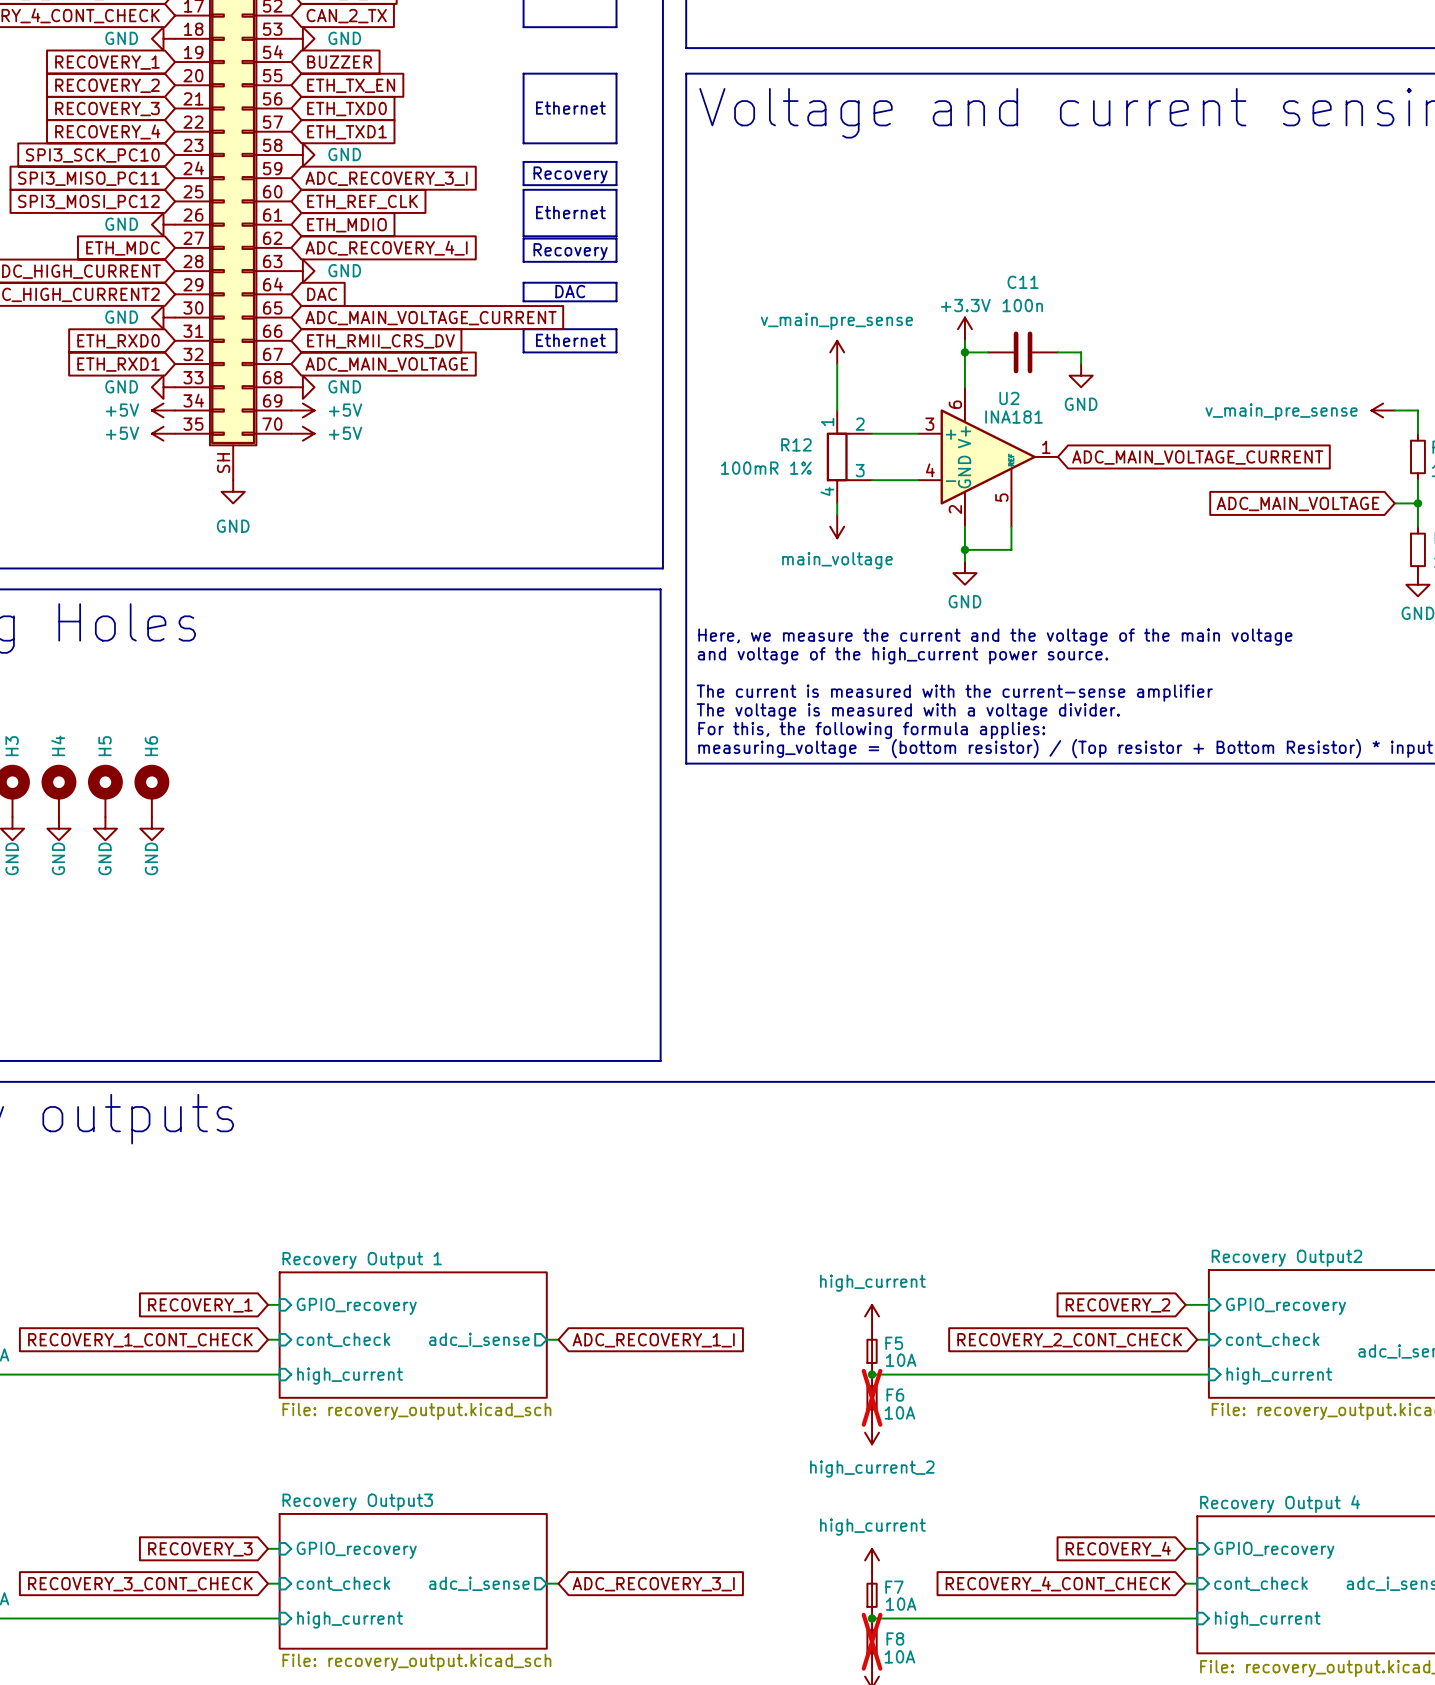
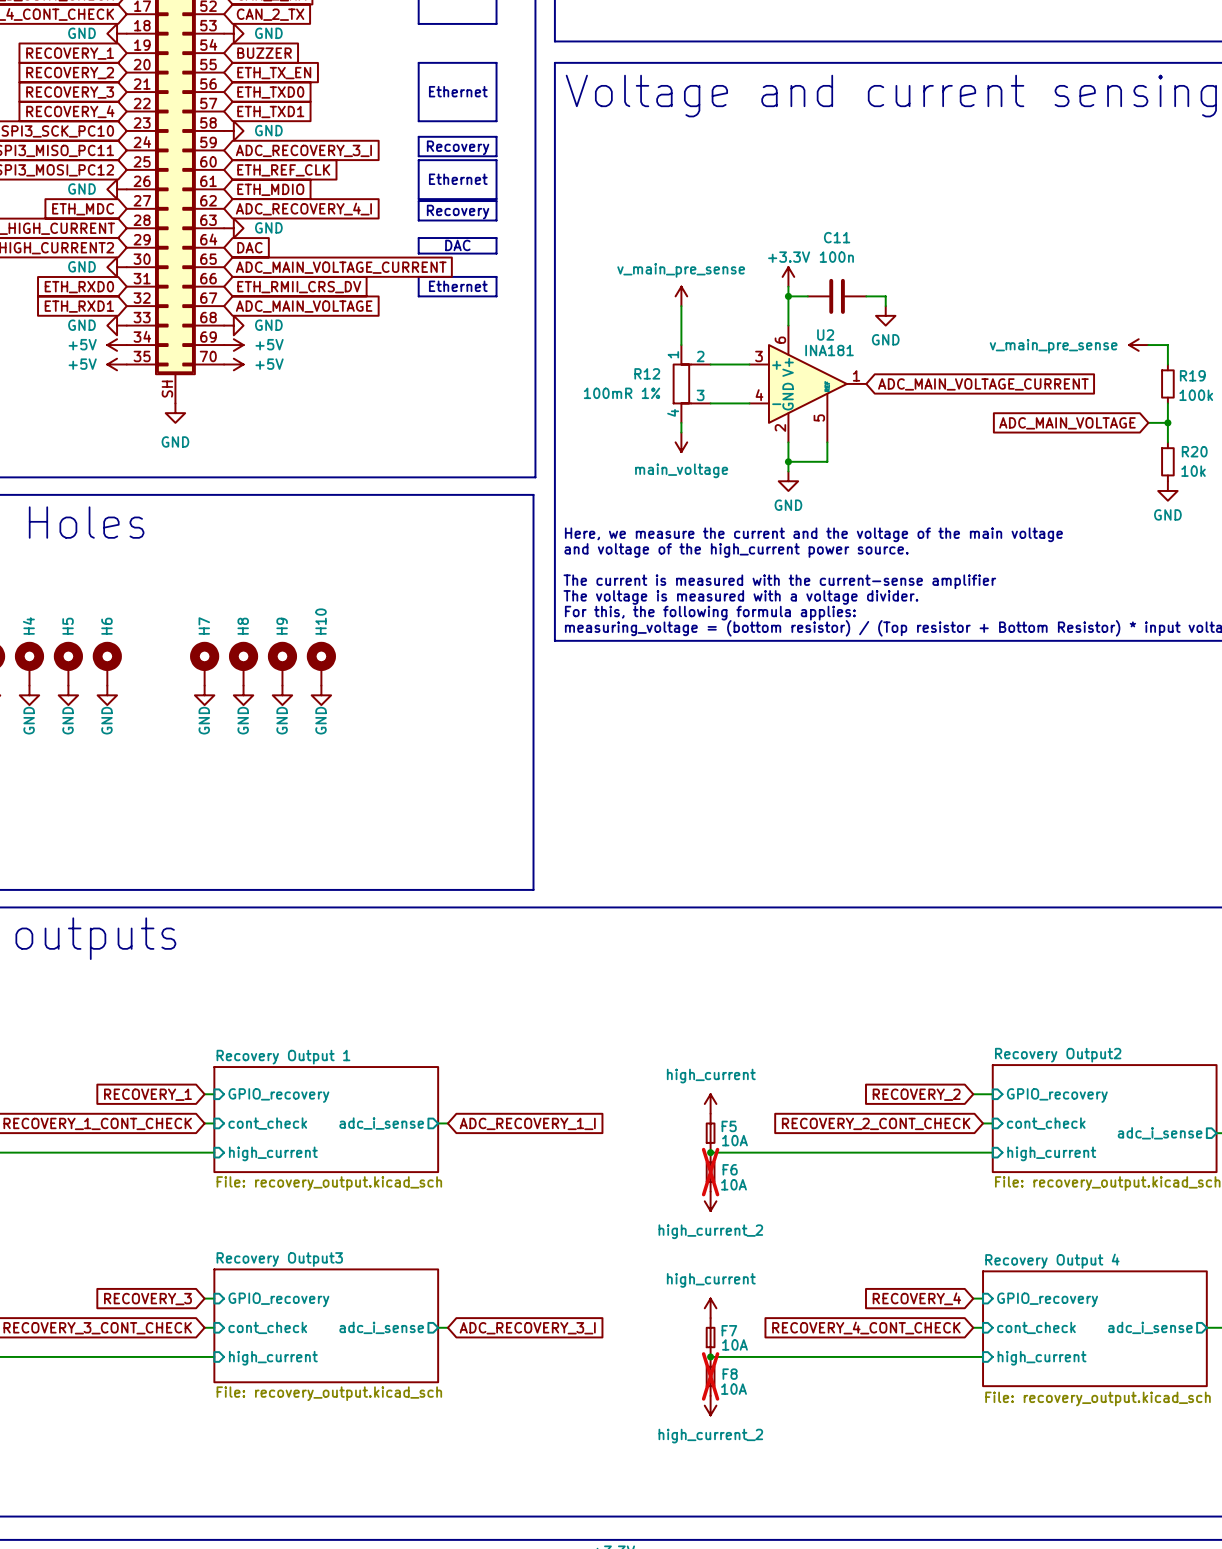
H7: none -> (204, 663)
H8: none -> (243, 663)
H9: none -> (282, 663)
H10: none -> (321, 663)
power symbol: none -> GND (204, 695)
power symbol: none -> GND (243, 695)
power symbol: none -> GND (282, 695)
power symbol: none -> GND (321, 695)

